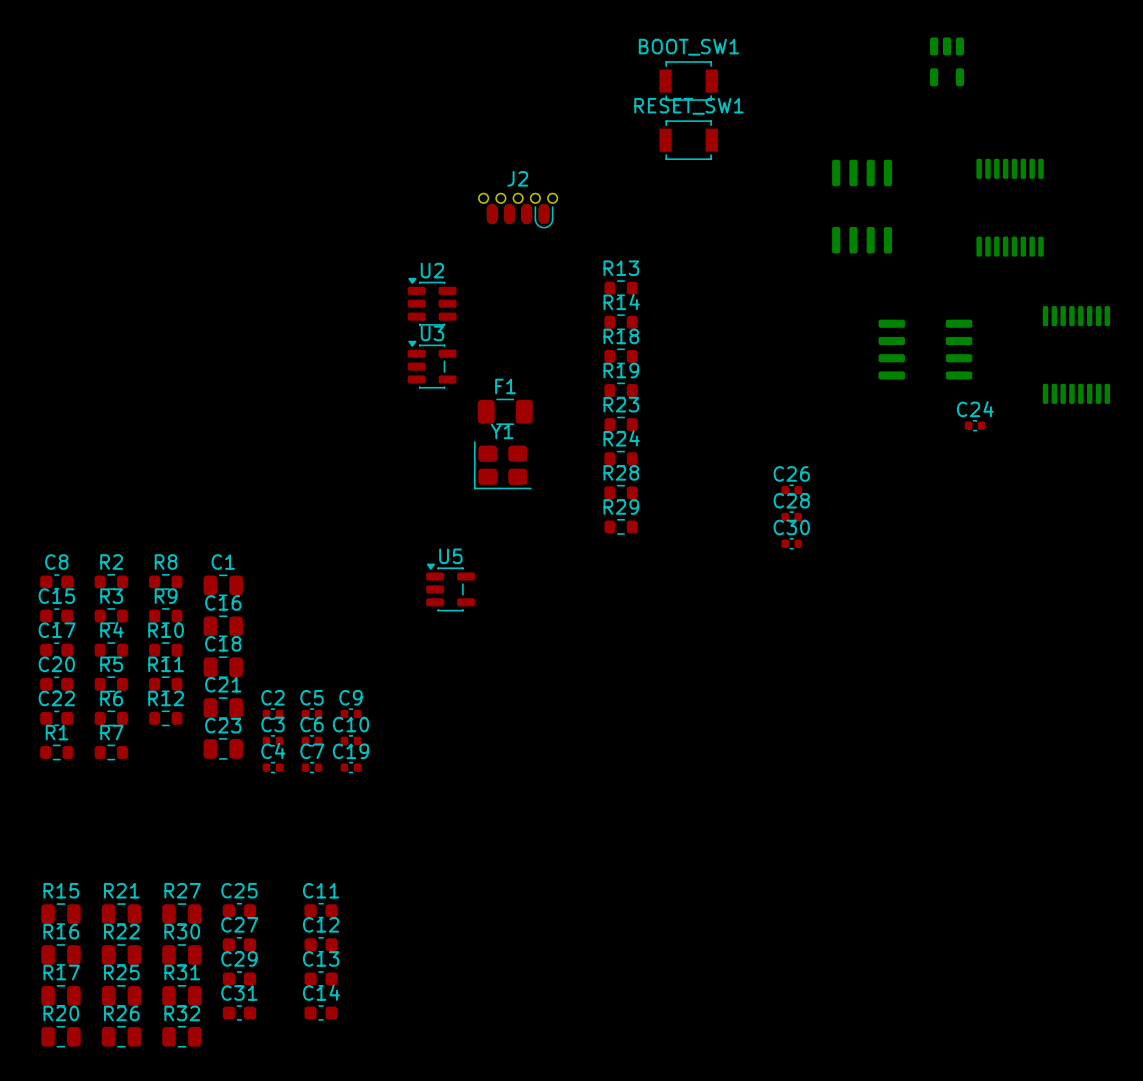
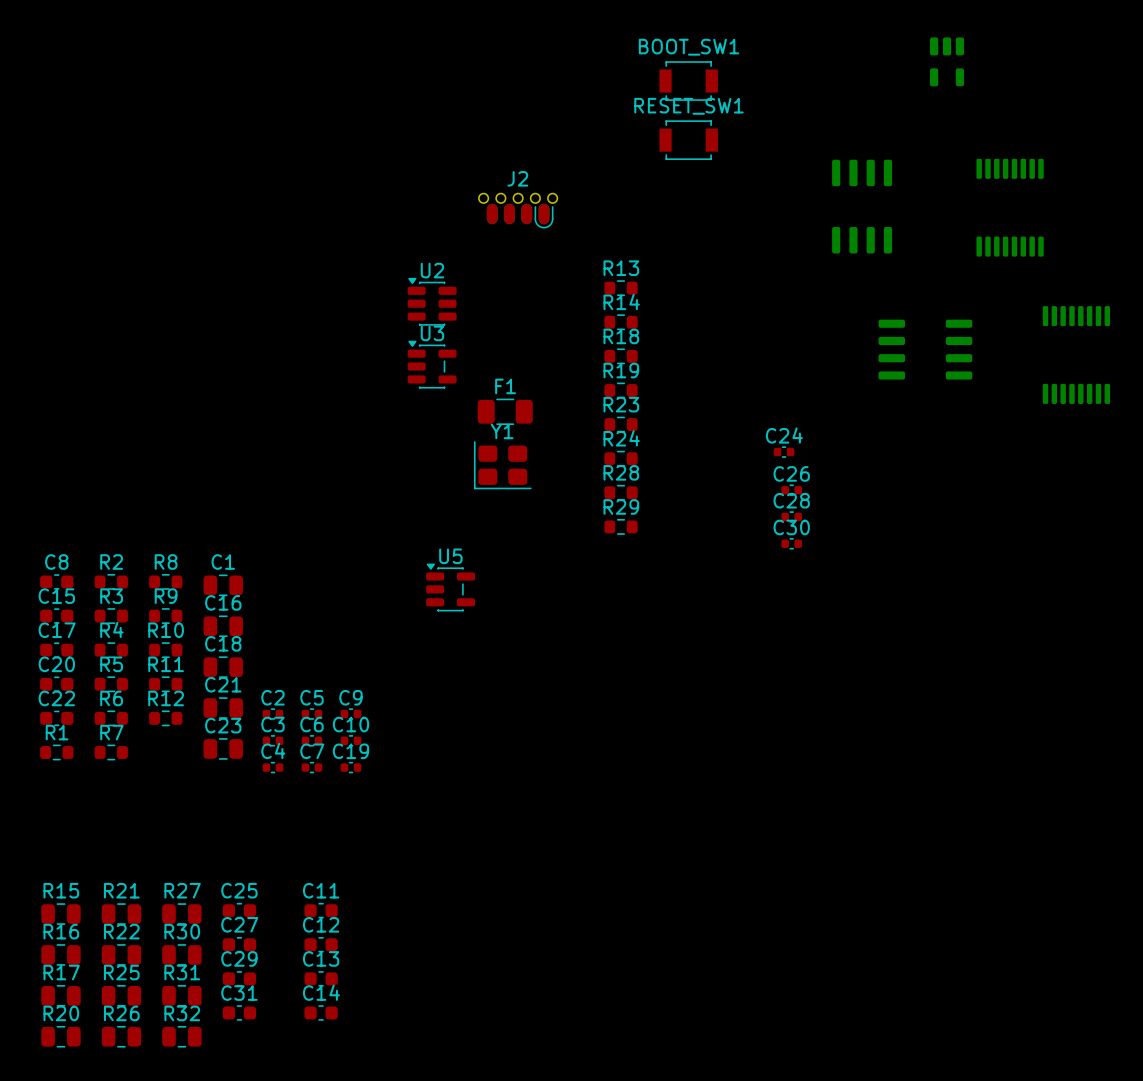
C24 position: (975, 425) -> (784, 452)

